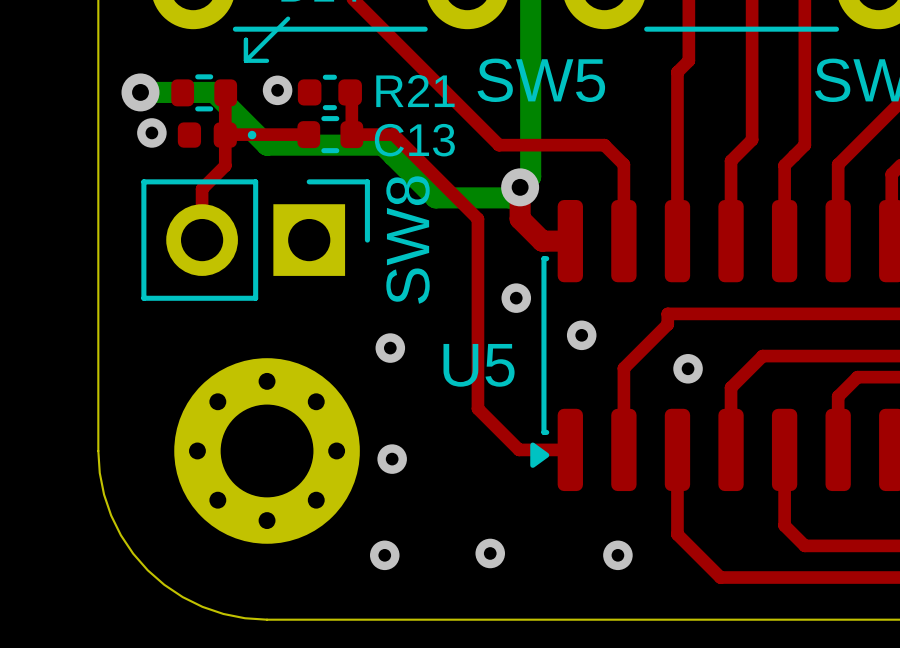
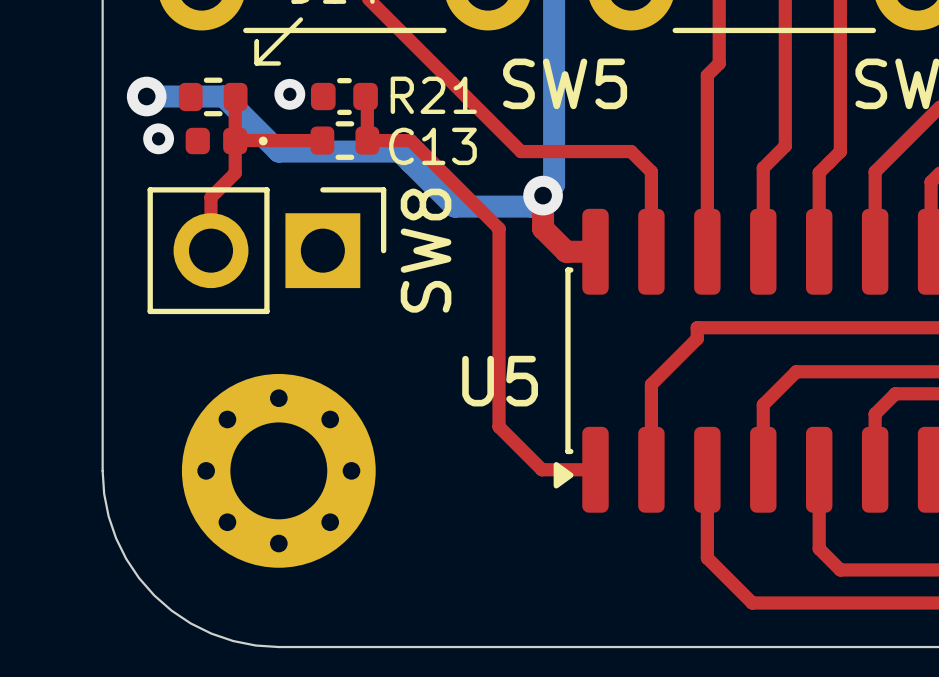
via: (516, 298) -> none
via: (581, 335) -> none
via: (390, 348) -> none
via: (688, 368) -> none
via: (392, 459) -> none
via: (490, 553) -> none
via: (384, 555) -> none
via: (617, 555) -> none

